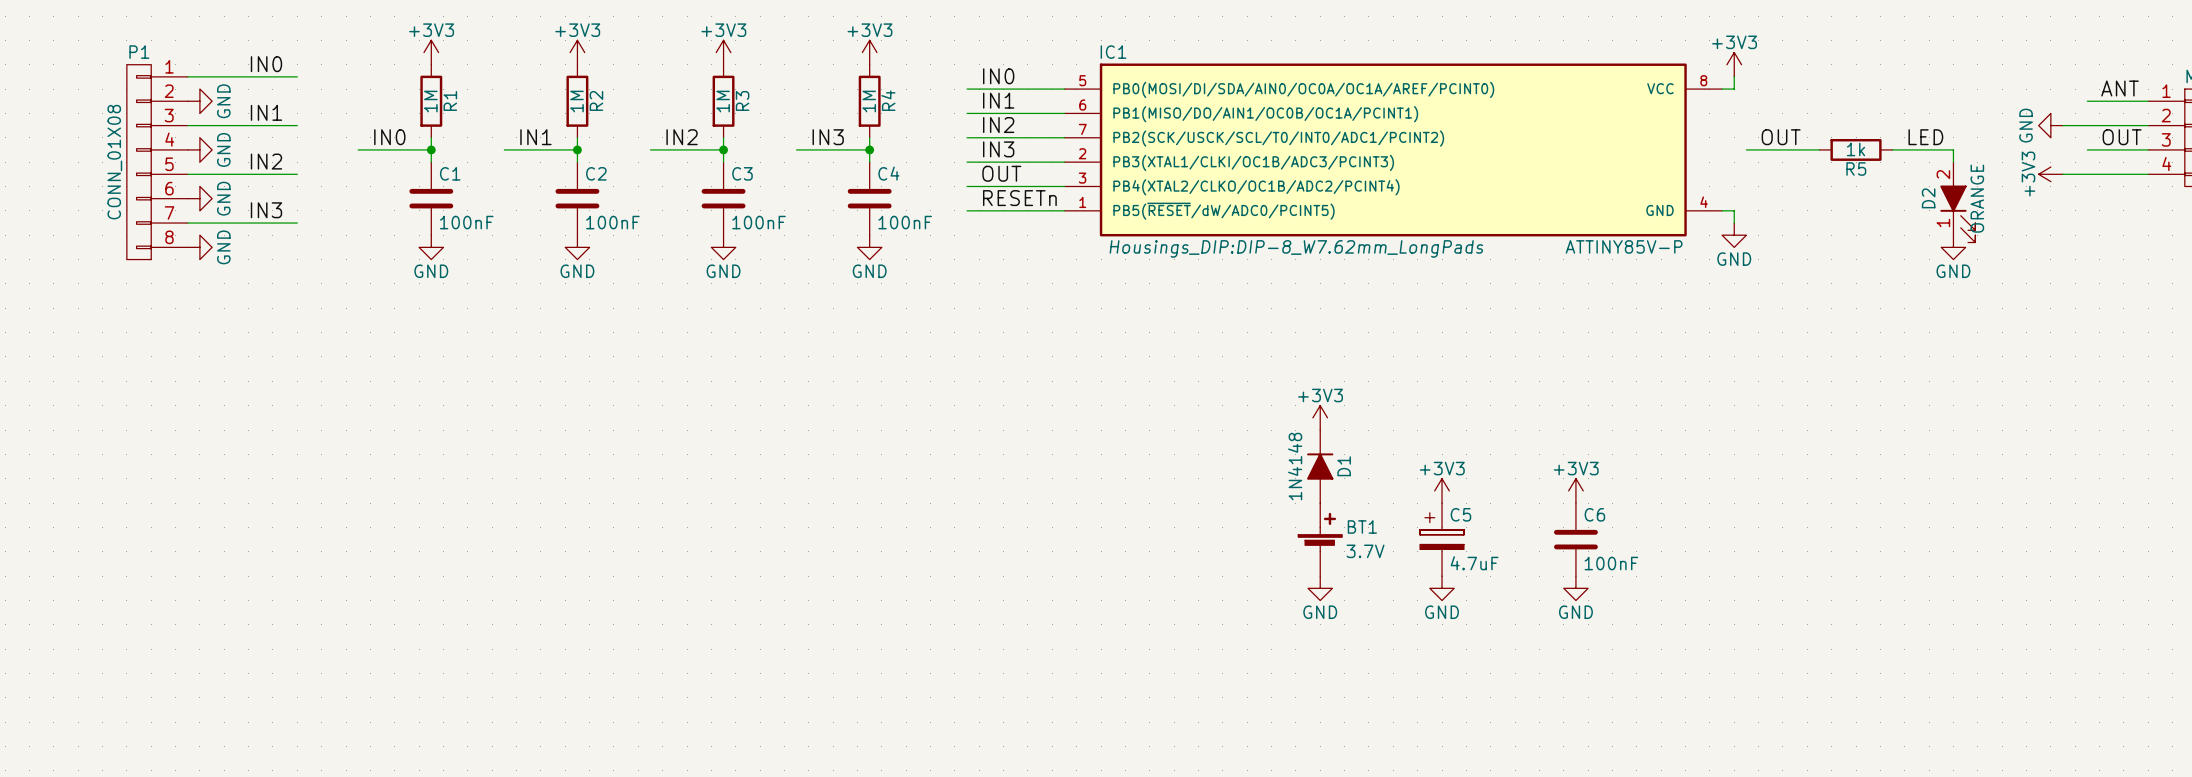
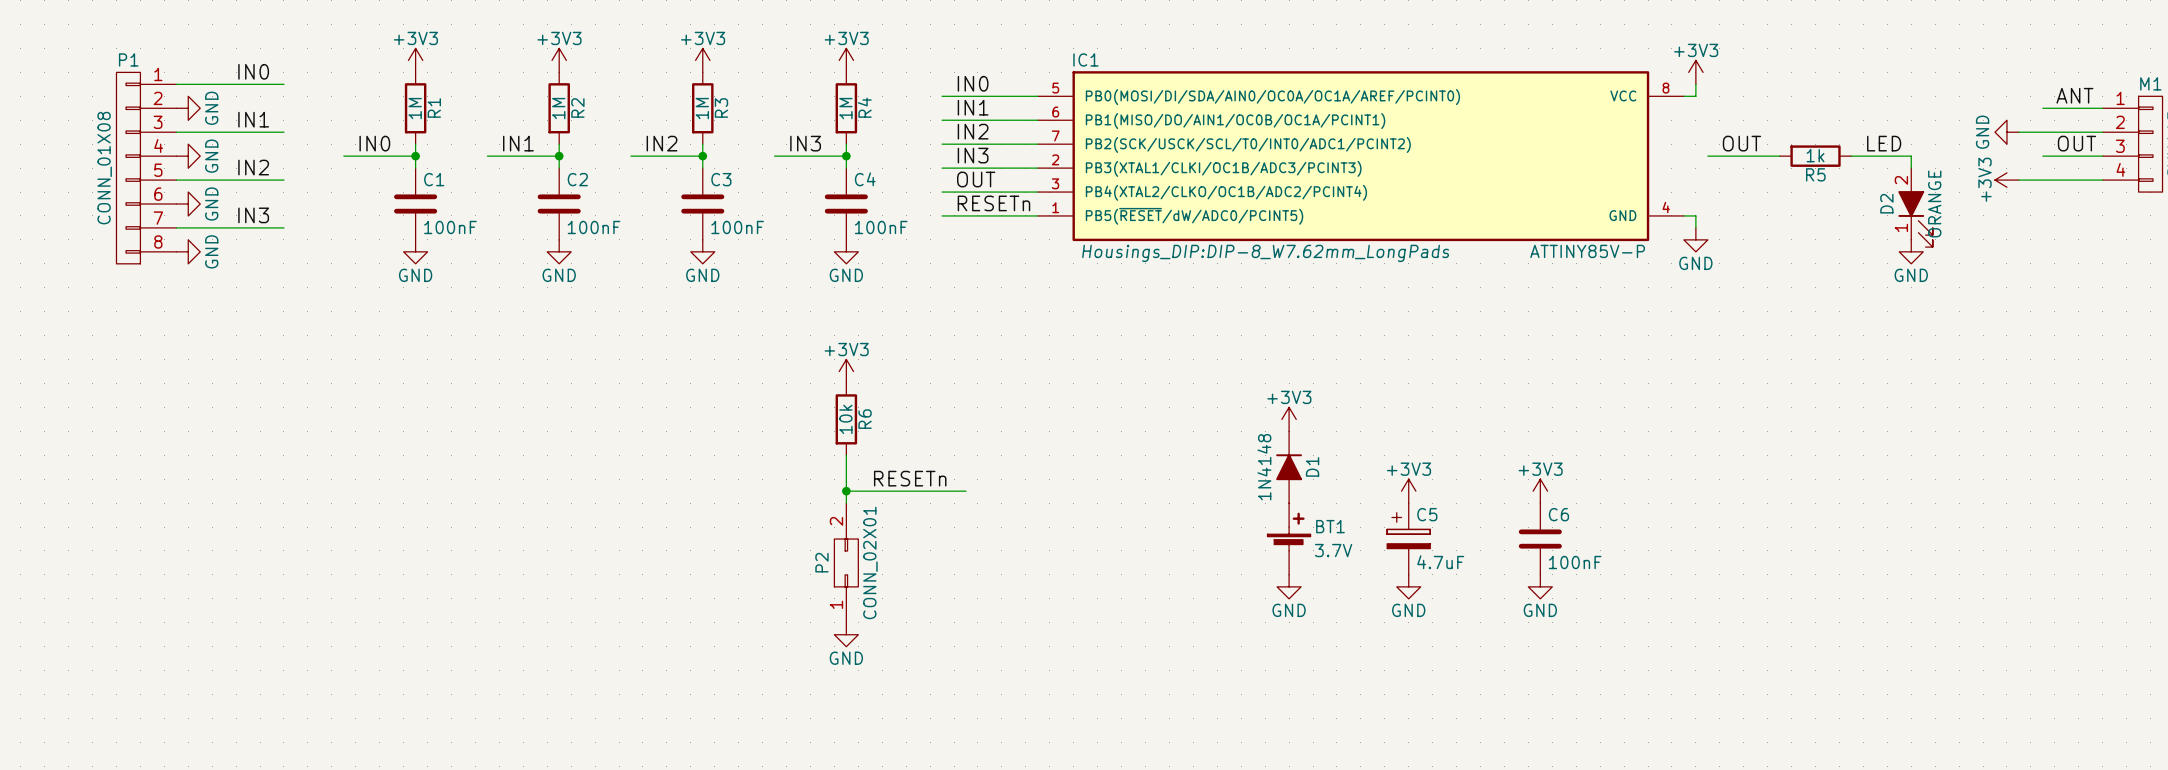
power symbol: none -> +3V3 (846, 371)
R6: none -> 10k (846, 419)
wire: none -> (846, 455) (846, 503)
label: none -> RESETn (910, 478)
wire: none -> (846, 491) (966, 491)
junction: none -> (846, 491)
P2: none -> CONN_02X01 (846, 562)
power symbol: none -> GND (846, 634)

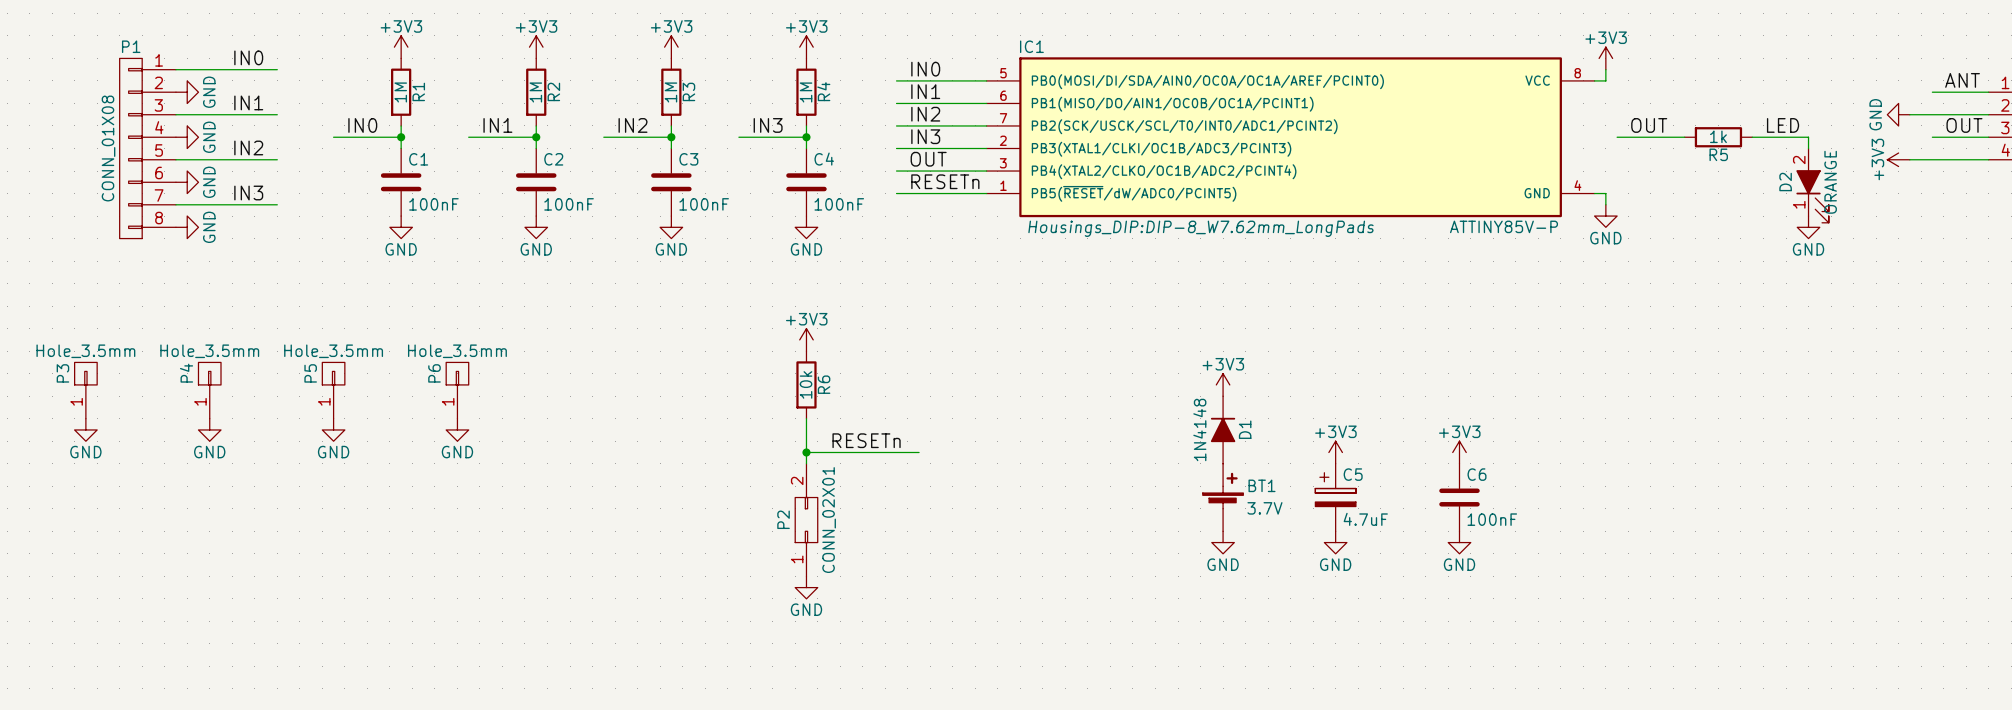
P3: none -> Hole_3.5mm (85, 390)
P4: none -> Hole_3.5mm (209, 390)
P5: none -> Hole_3.5mm (333, 390)
P6: none -> Hole_3.5mm (457, 390)
power symbol: none -> GND (85, 429)
power symbol: none -> GND (209, 429)
power symbol: none -> GND (333, 429)
power symbol: none -> GND (457, 429)

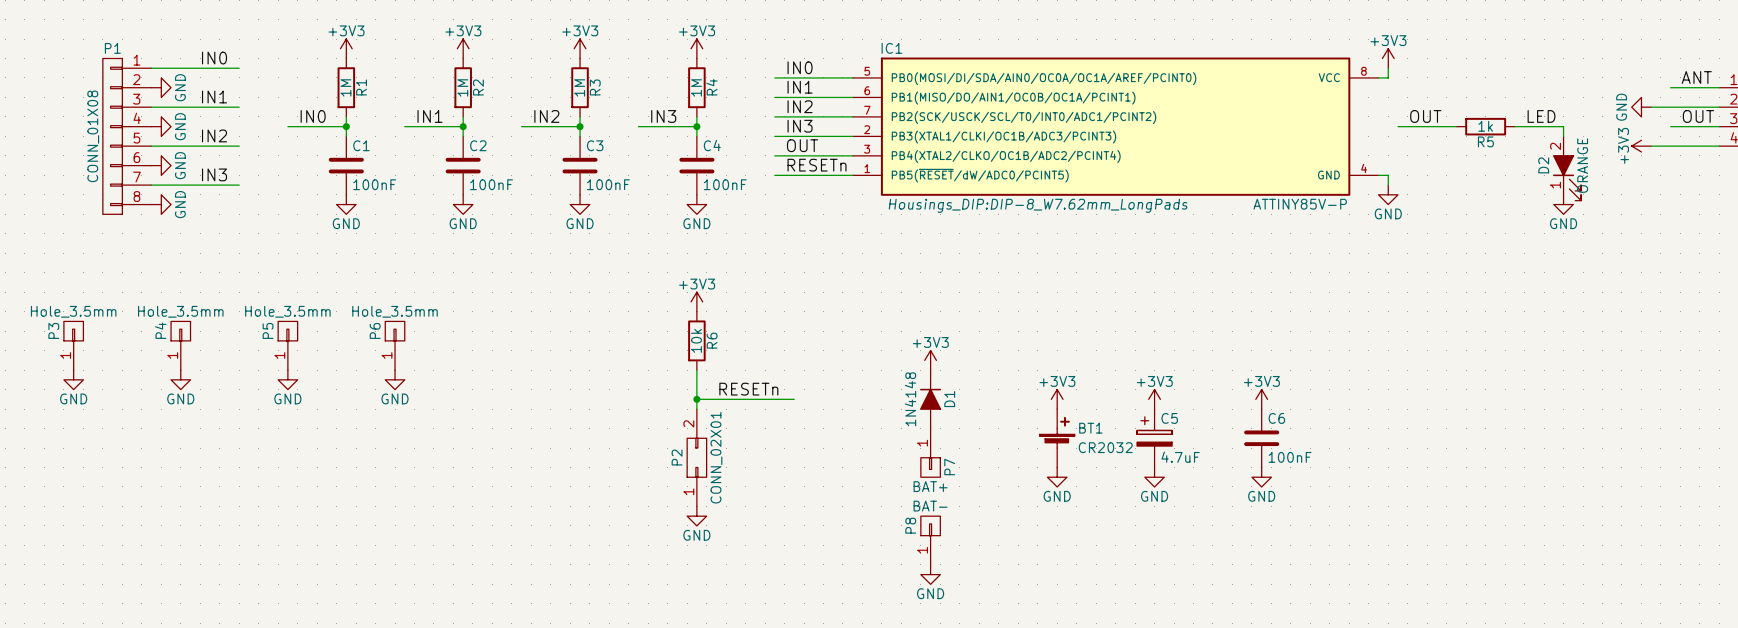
power symbol position: +3V3 (1223, 384) -> +3V3 (1057, 399)
power symbol: none -> +3V3 (930, 360)
D1 position: (1223, 429) -> (930, 399)
BT1 value: 3.7V (1264, 508) -> CR2032 (1105, 447)
P7: none -> BAT+ (930, 452)
P8: none -> BAT- (930, 540)
power symbol: none -> GND (930, 574)

